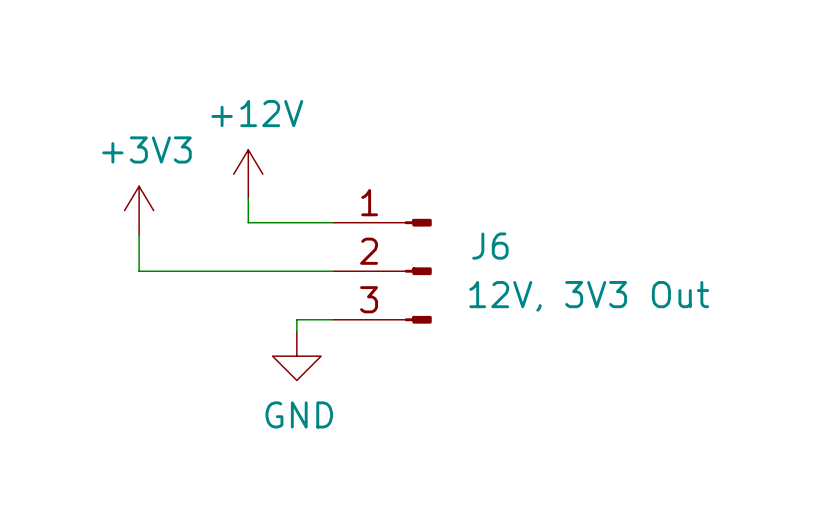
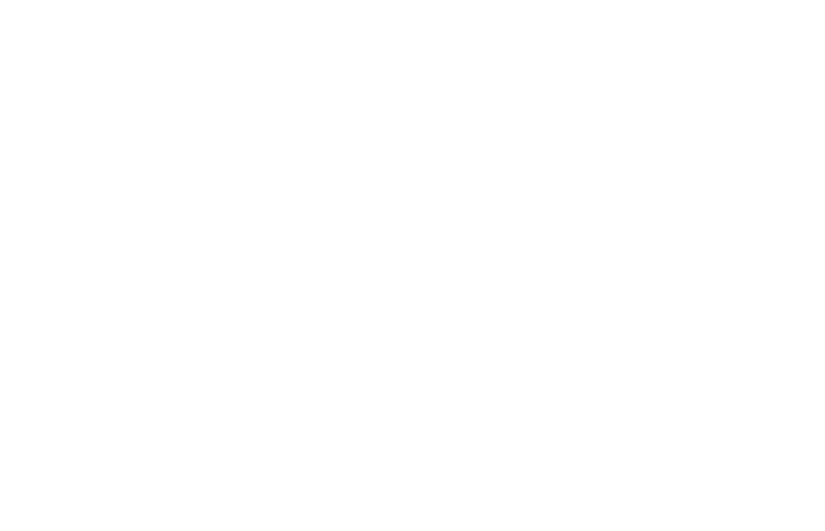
power symbol: +12V (248, 174) -> none
wire: (248, 198) (248, 222) (333, 222) -> none
power symbol: +3V3 (139, 210) -> none
wire: (139, 234) (139, 271) (333, 271) -> none
J6: 12V, 3V3 Out (382, 271) -> none
wire: (333, 319) (296, 319) (296, 331) -> none
power symbol: GND (296, 356) -> none

